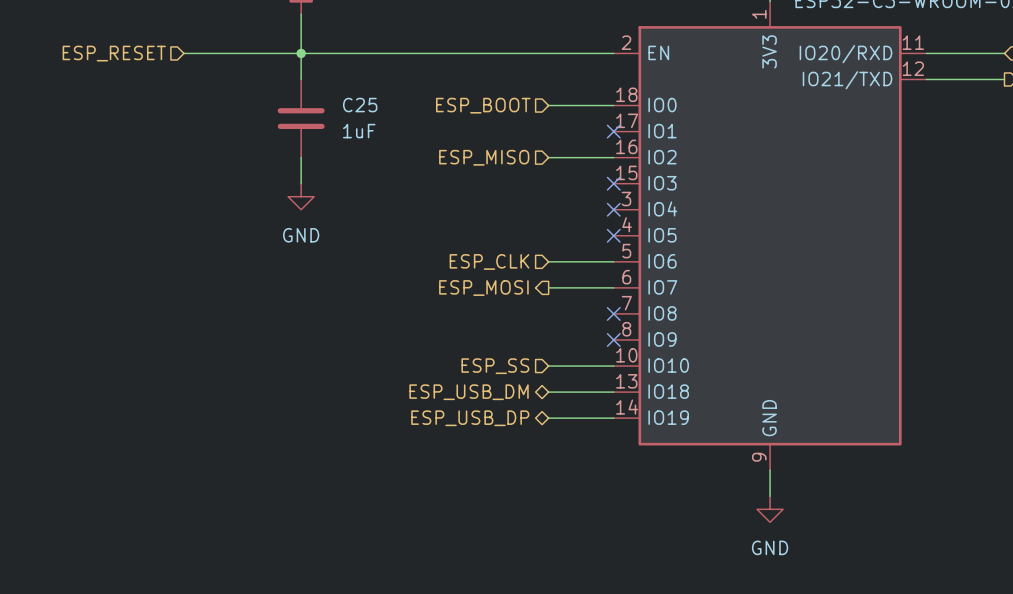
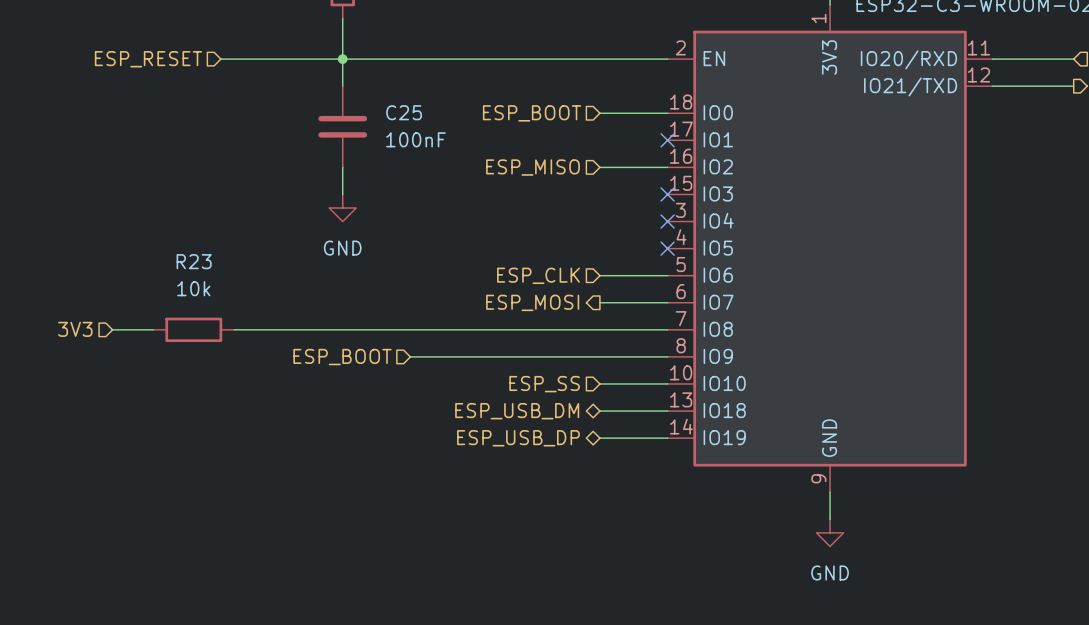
C25 value: 1uF (359, 131) -> 100nF (415, 139)
hierarchical label: none -> 3V3 (75, 329)
wire: none -> (112, 329) (153, 329)
R23: none -> 10k (193, 329)
wire: none -> (234, 329) (667, 329)
no-connect mark: (613, 313) -> none
wire: none -> (410, 356) (667, 356)
no-connect mark: (613, 339) -> none
hierarchical label: none -> ESP_BOOT (342, 357)

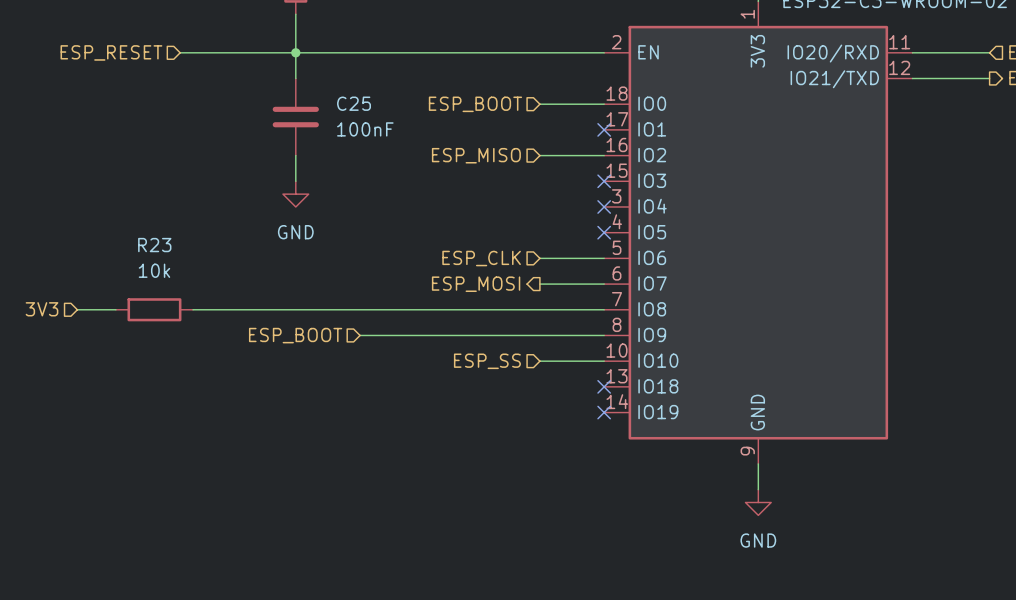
hierarchical label: ESP_USB_DM (517, 411) -> none
wire: (599, 411) (667, 411) -> none
no-connect mark: none -> (604, 386)
hierarchical label: ESP_USB_DP (518, 438) -> none
wire: (599, 438) (667, 438) -> none
no-connect mark: none -> (604, 412)

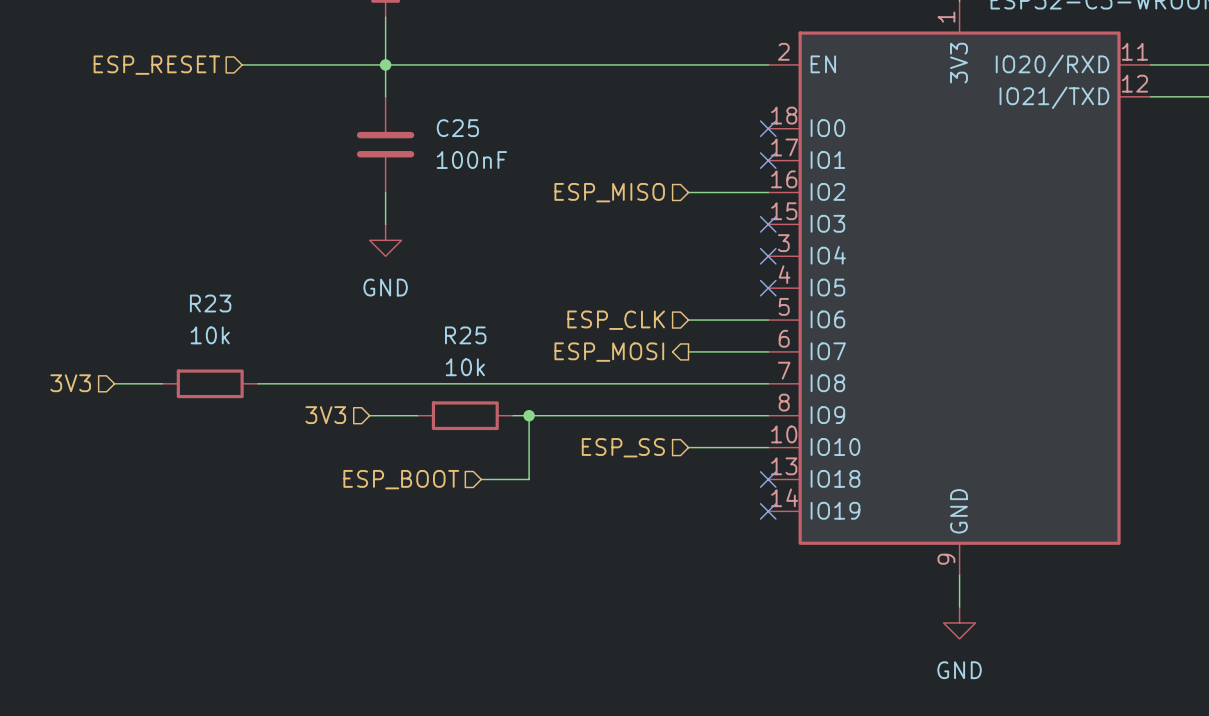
hierarchical label: ESP_BOOT (475, 104) -> none
wire: (539, 104) (604, 104) -> none
no-connect mark: none -> (768, 128)
hierarchical label: none -> 3V3 (325, 415)
hierarchical label position: ESP_BOOT (295, 335) -> ESP_BOOT (401, 479)
wire: (360, 335) (398, 335) -> (369, 415) (417, 415)
R25: none -> 10k (465, 415)
wire: none -> (529, 415) (529, 479) (481, 479)
junction: none -> (529, 415)

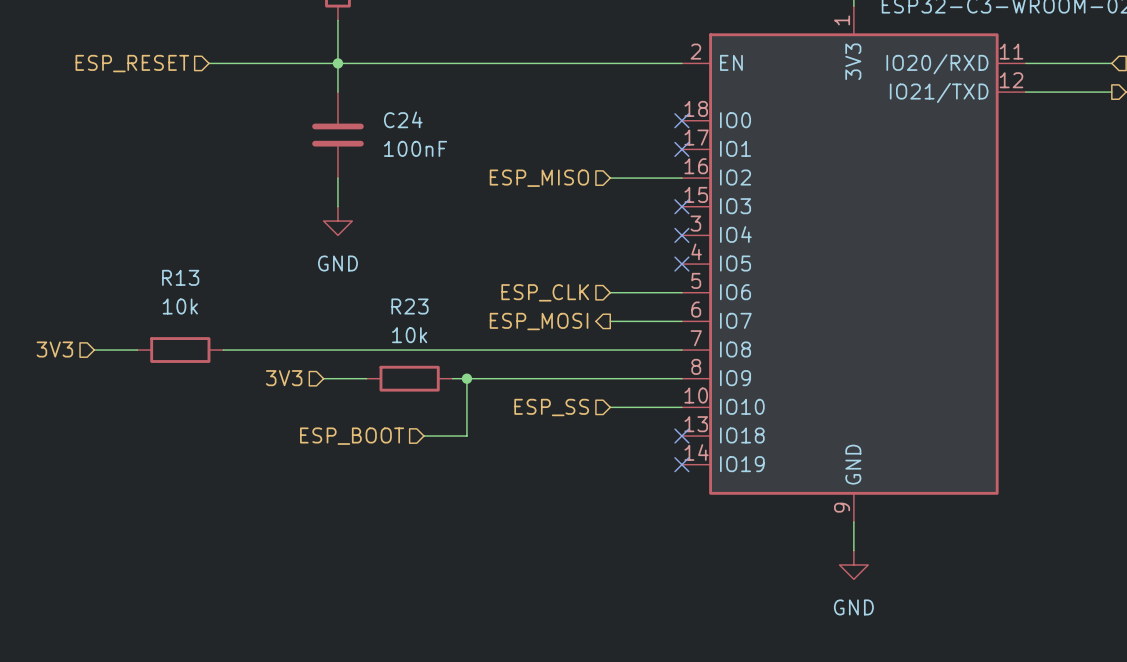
C25 name: C25 (457, 128) -> C24 (403, 119)
R23 name: R23 (210, 303) -> R13 (180, 277)
R25 name: R25 (465, 335) -> R23 (409, 306)

